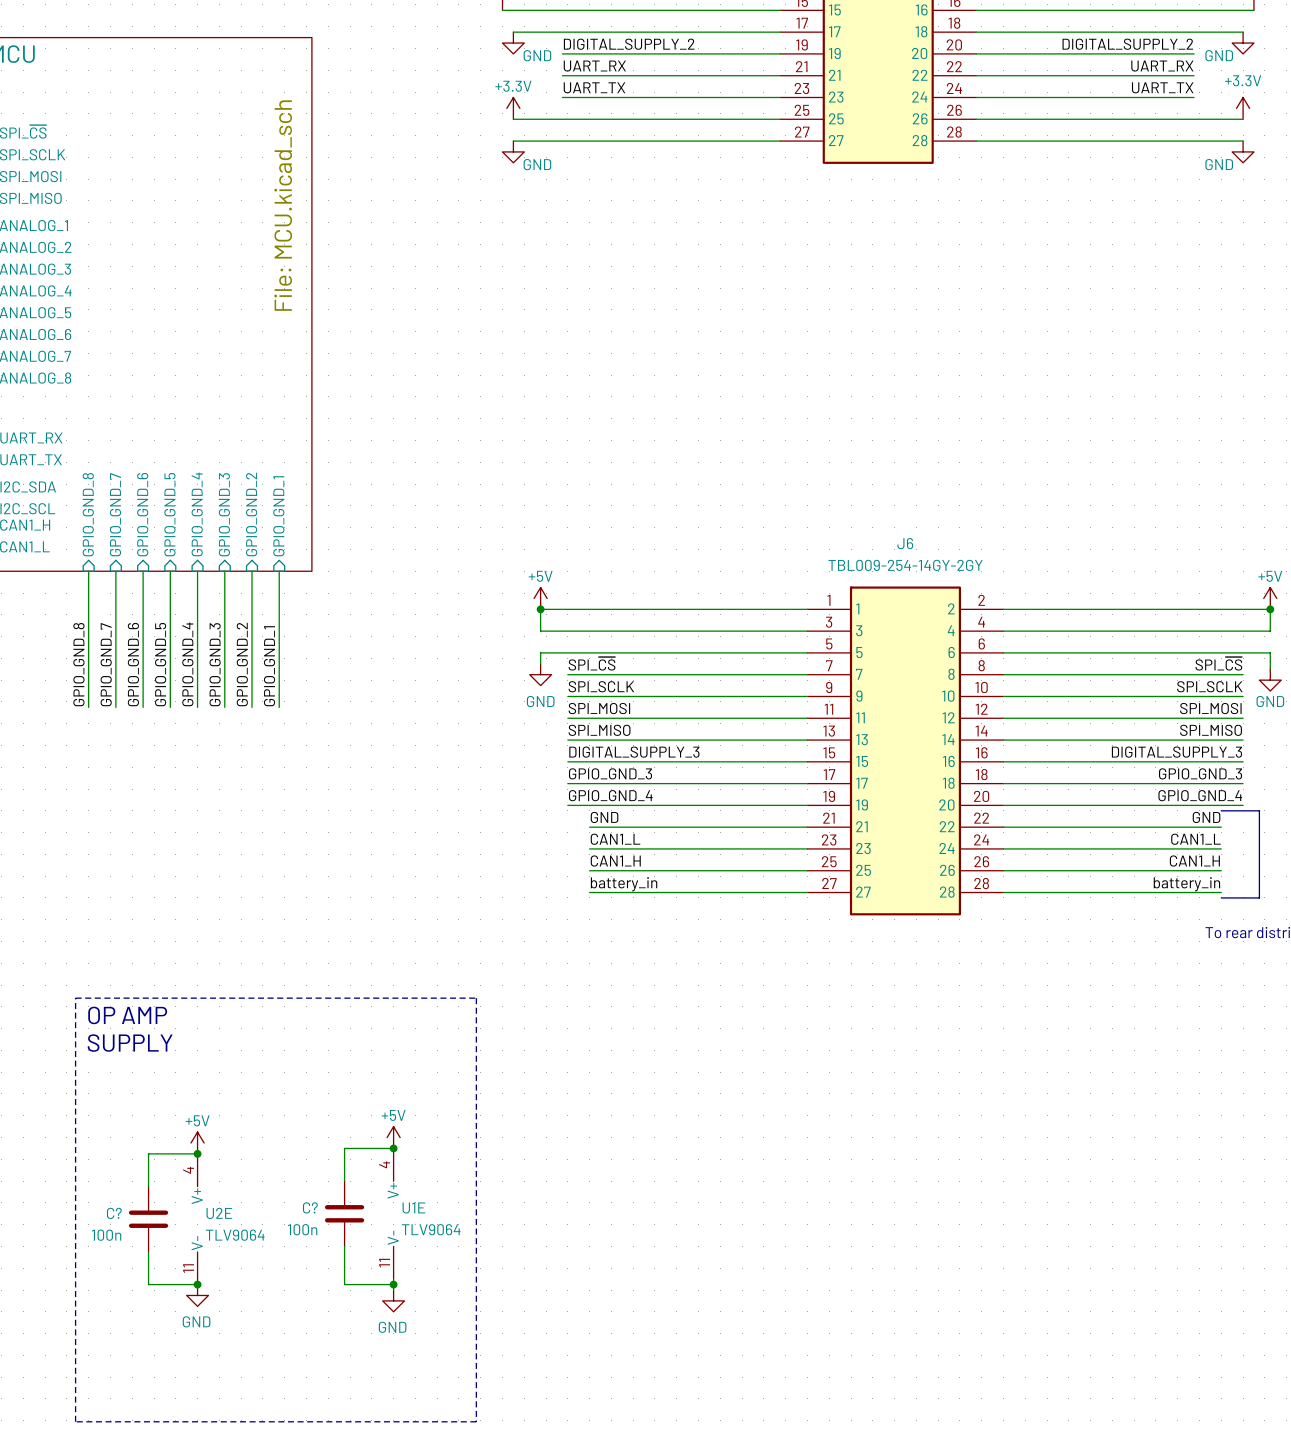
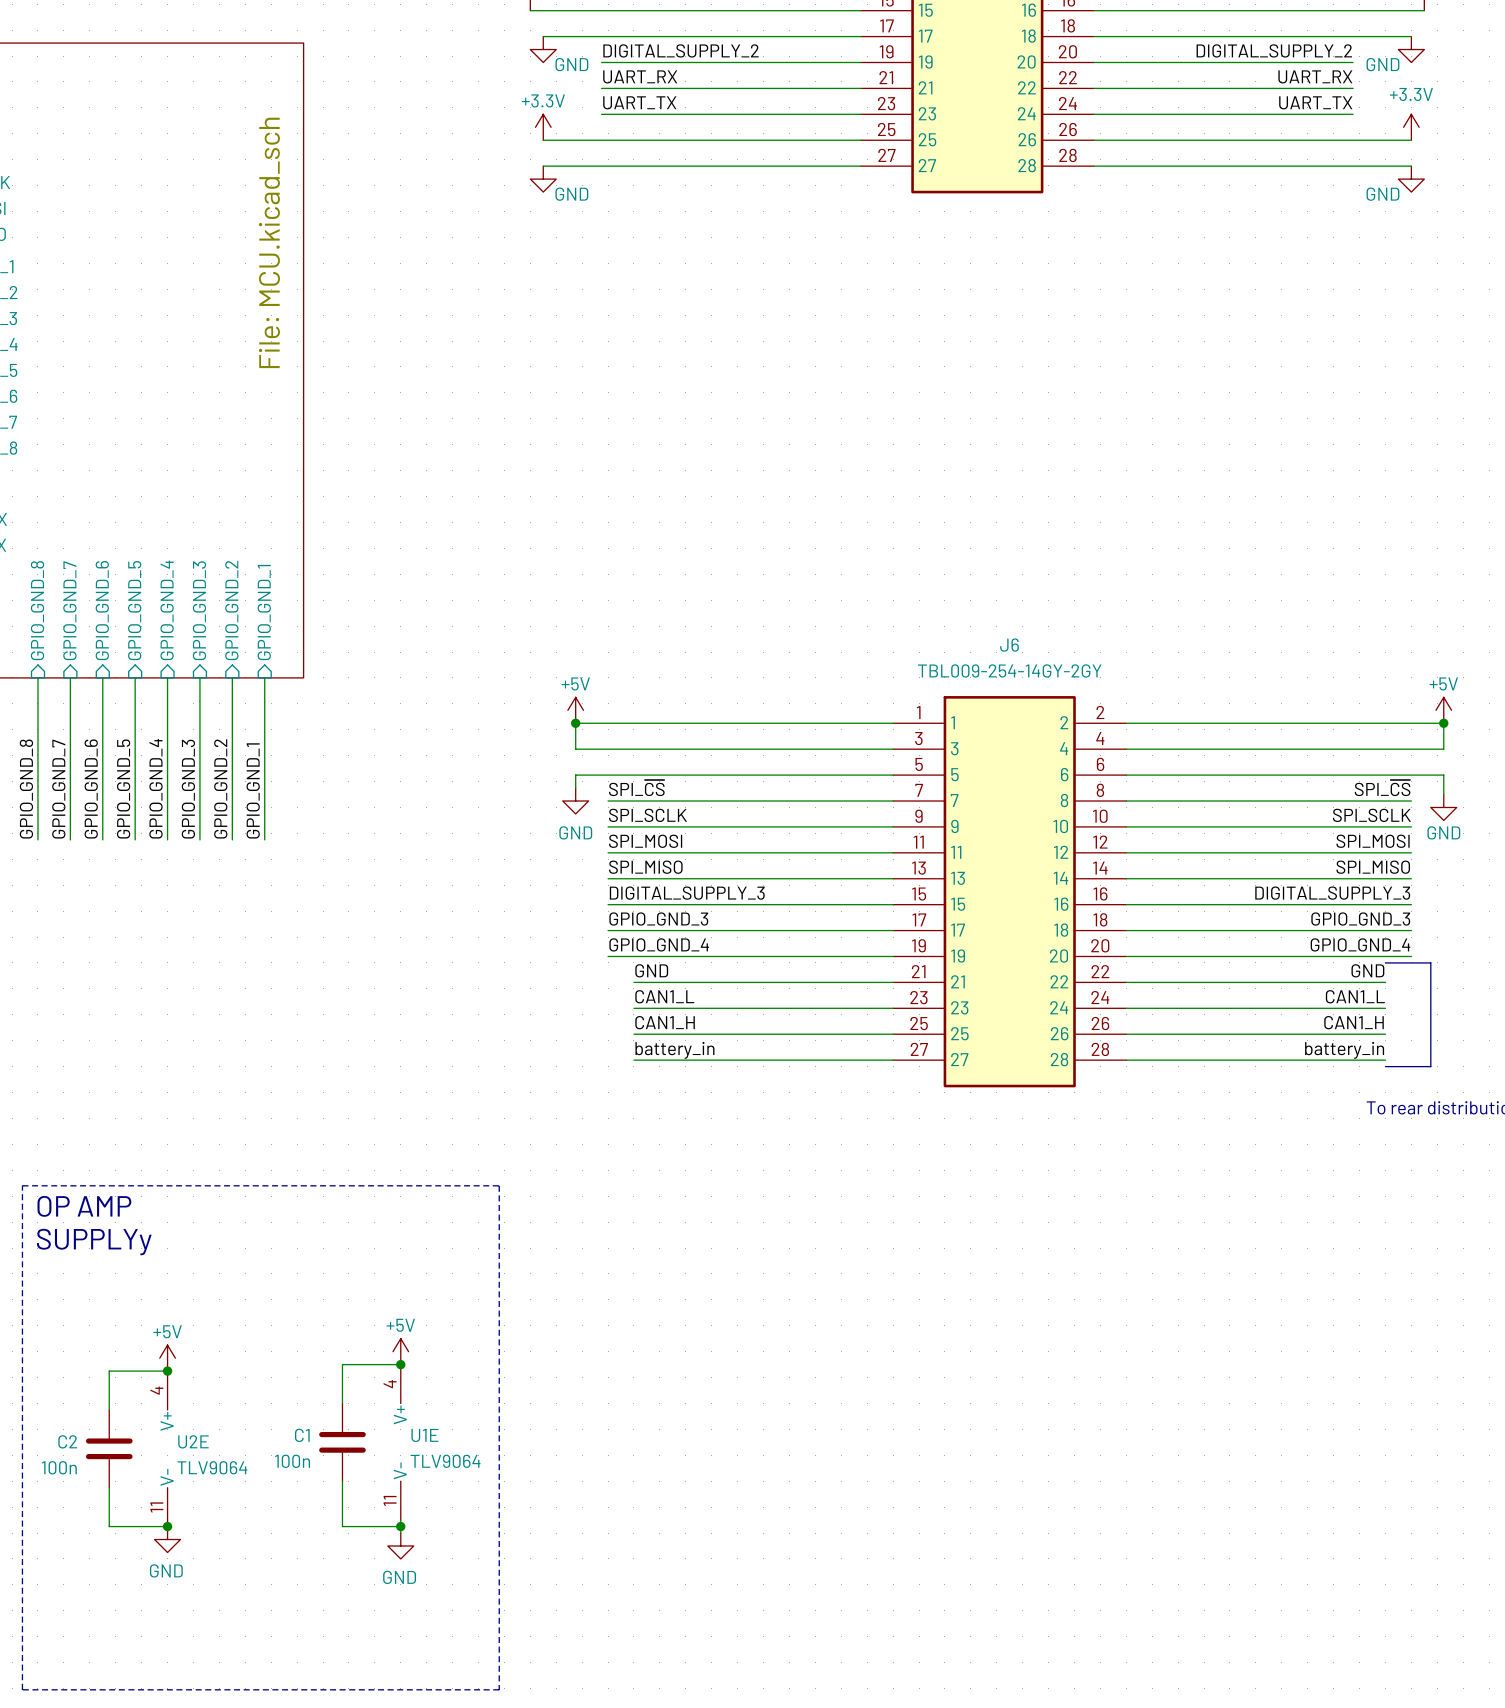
text: SUPPLY (130, 1043) -> SUPPLYy (94, 1242)
C? name: C? (310, 1207) -> C1 (302, 1435)
C? name: C? (114, 1213) -> C2 (67, 1441)

